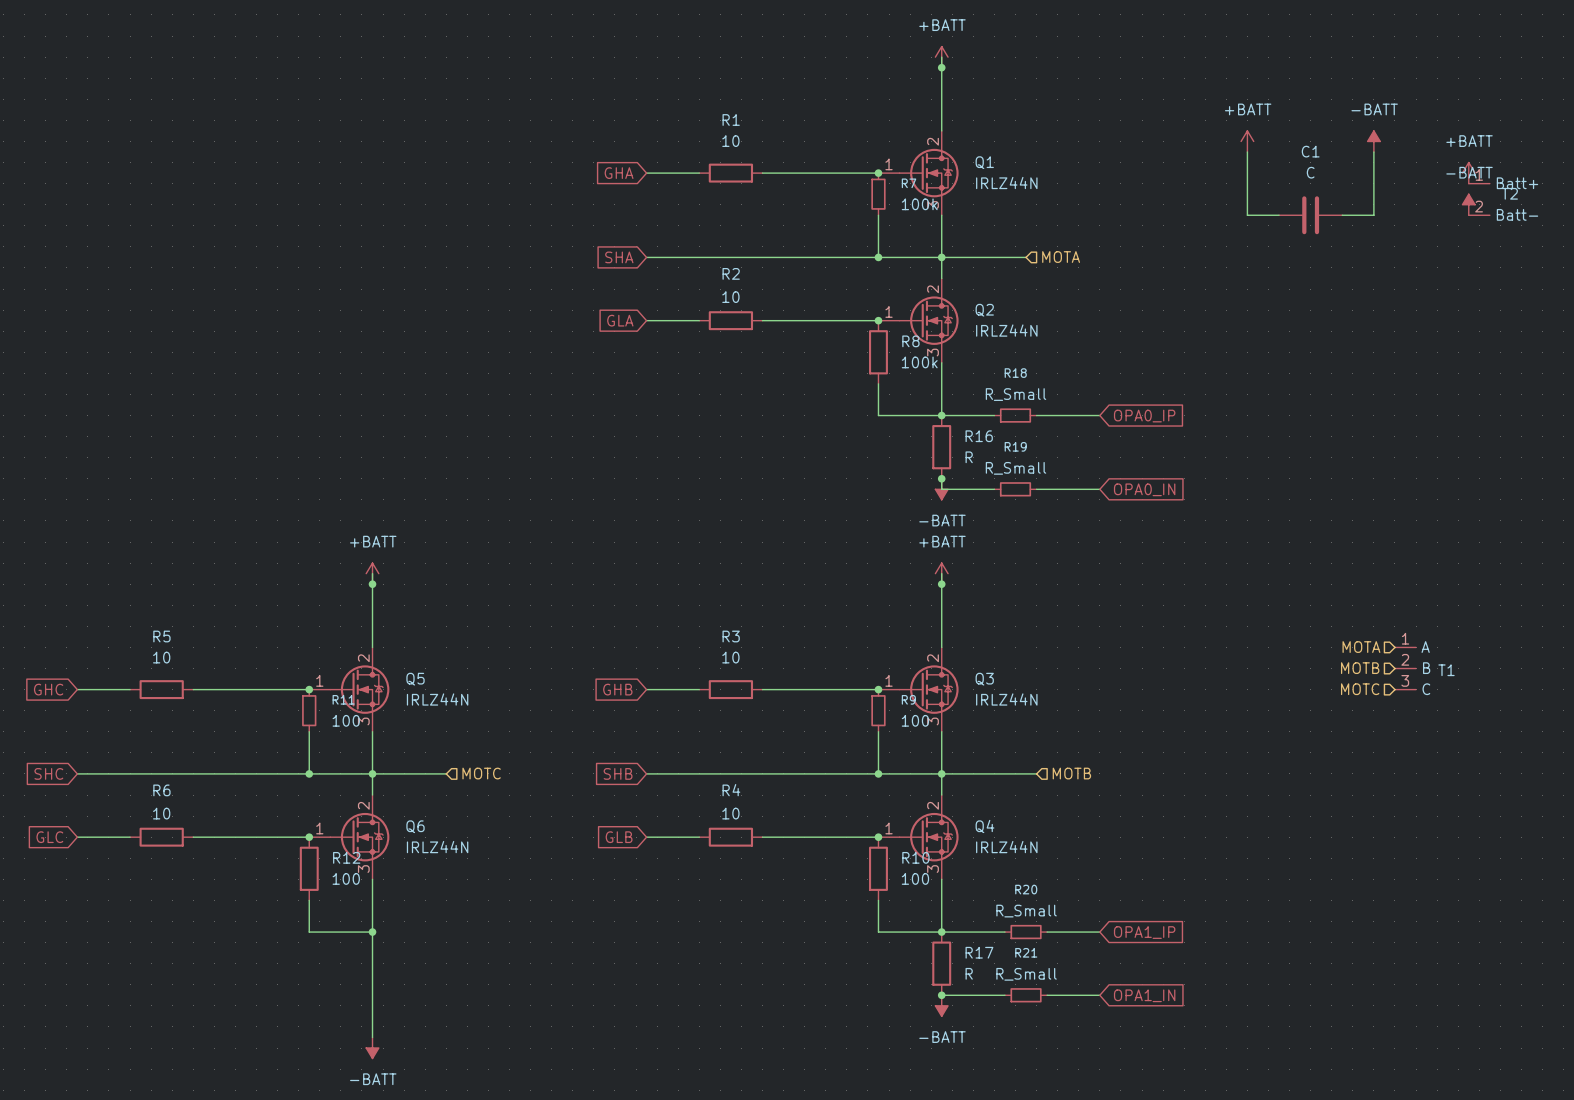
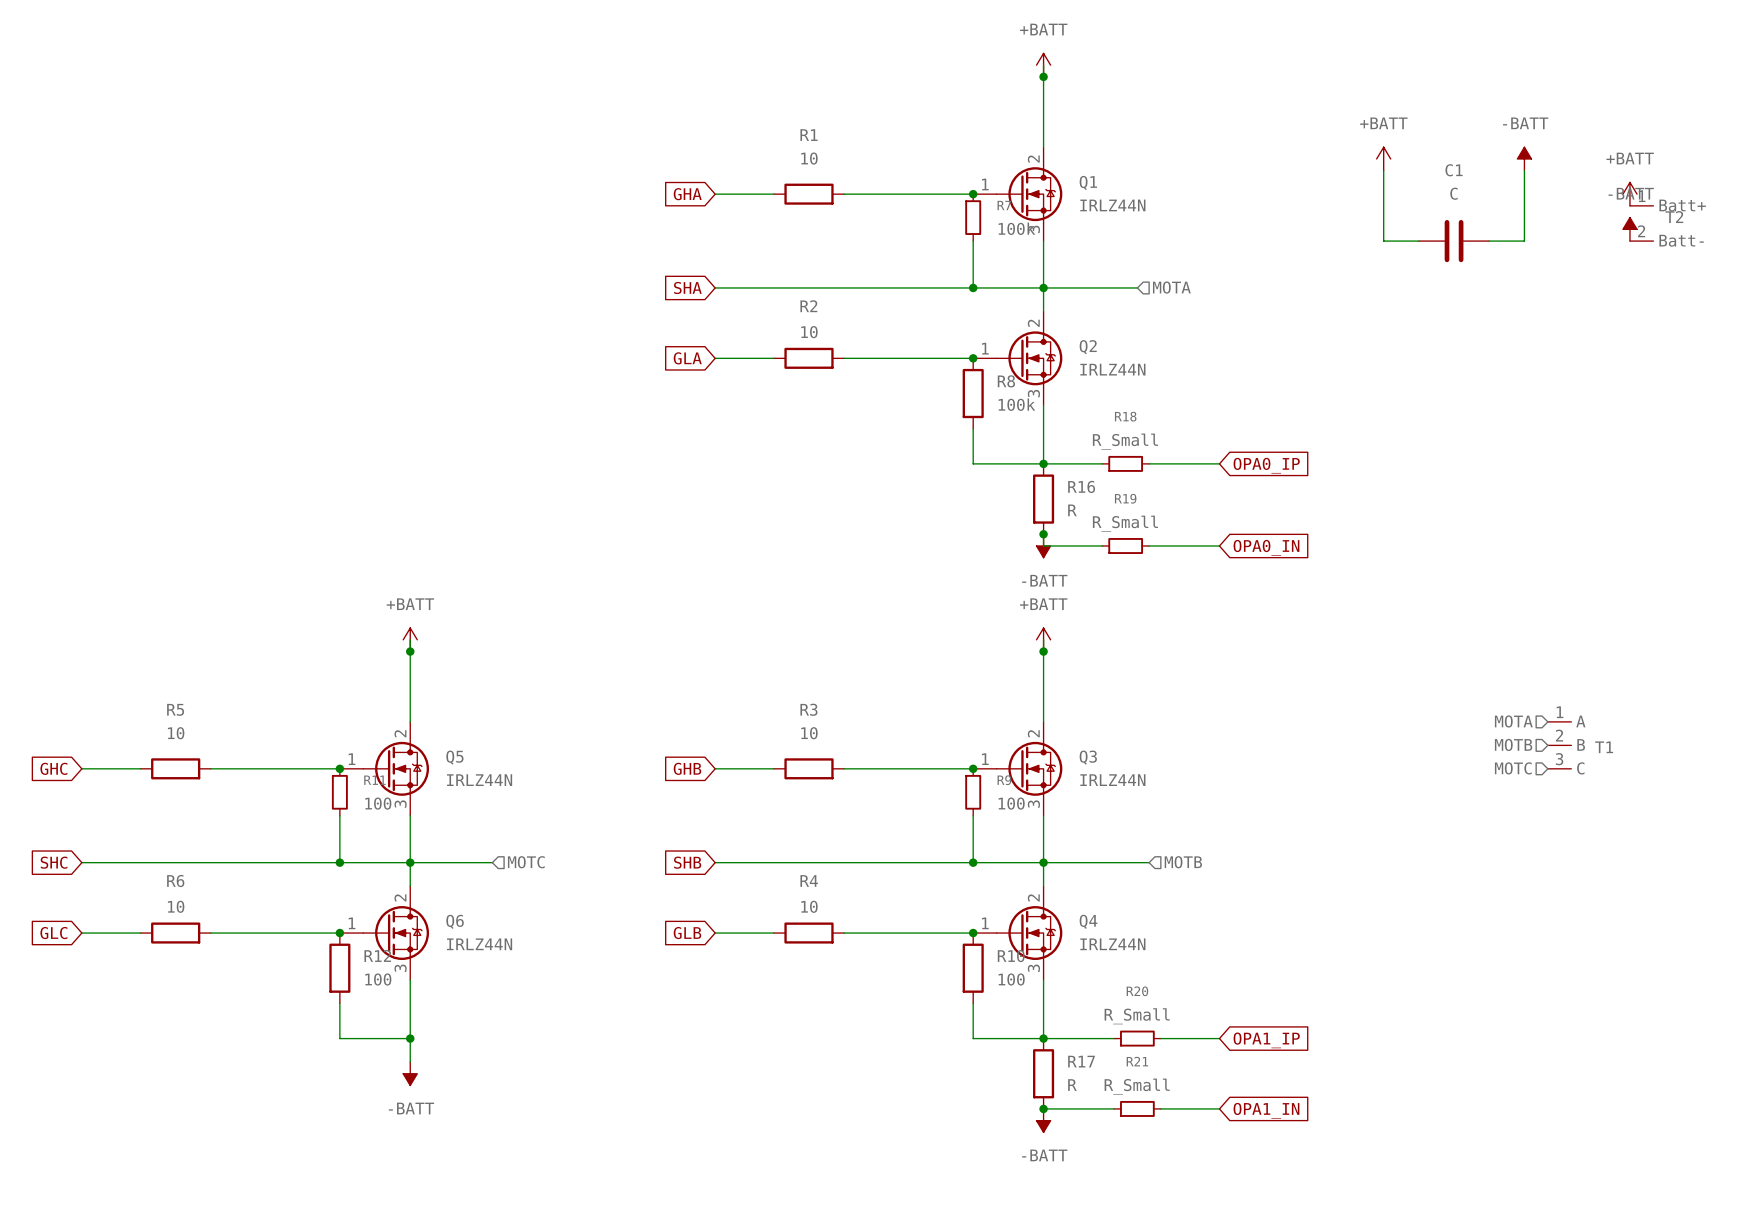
wire: (372, 953) (372, 1037) -> none
power symbol position: -BATT (372, 1048) -> -BATT (410, 1073)

